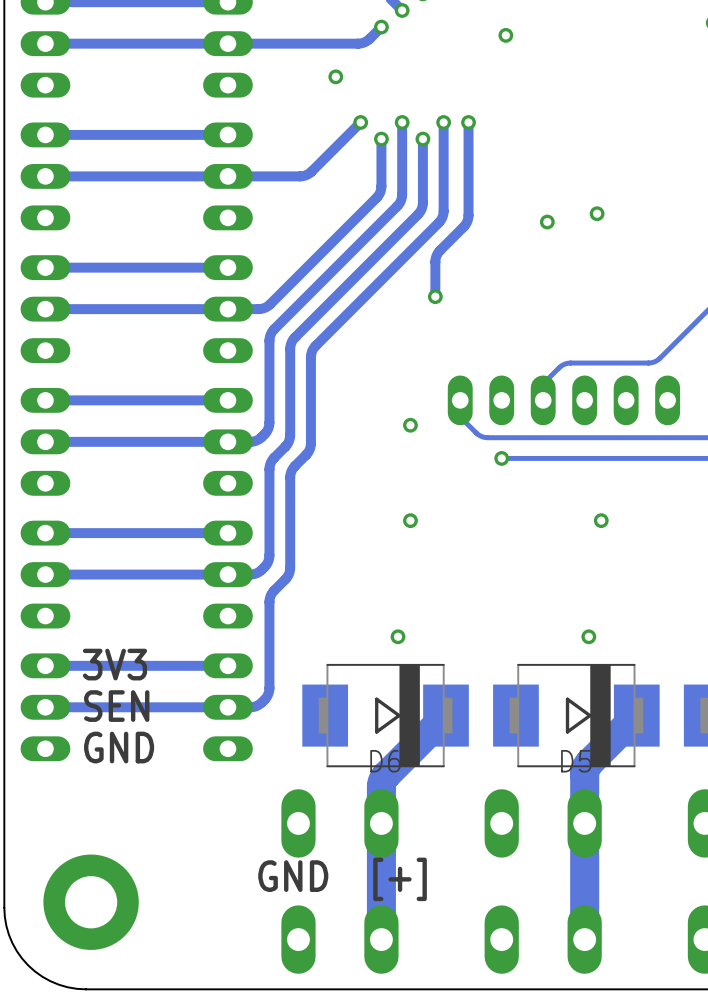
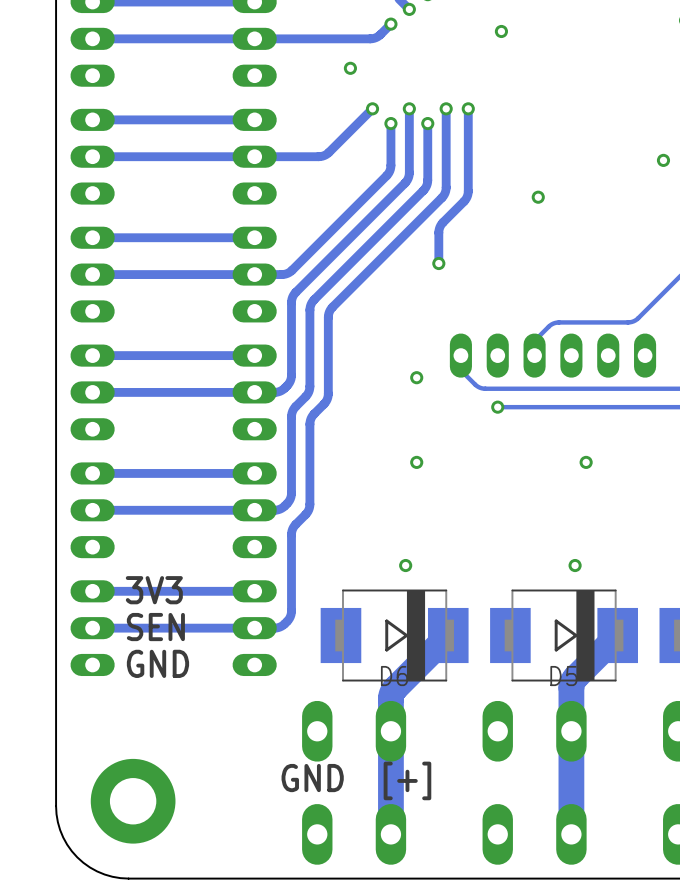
via position: (597, 213) -> (663, 160)

